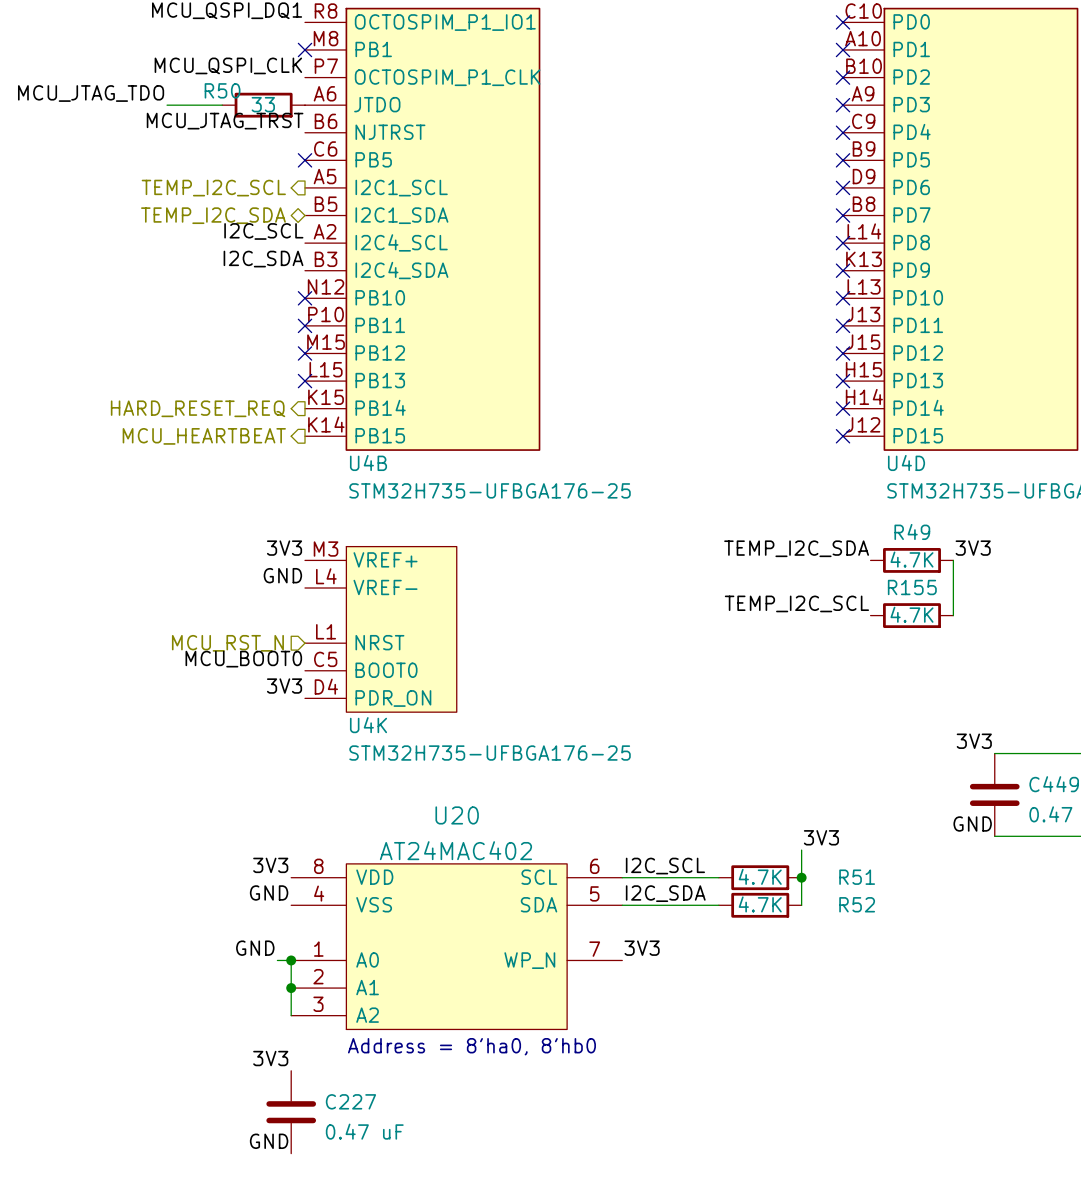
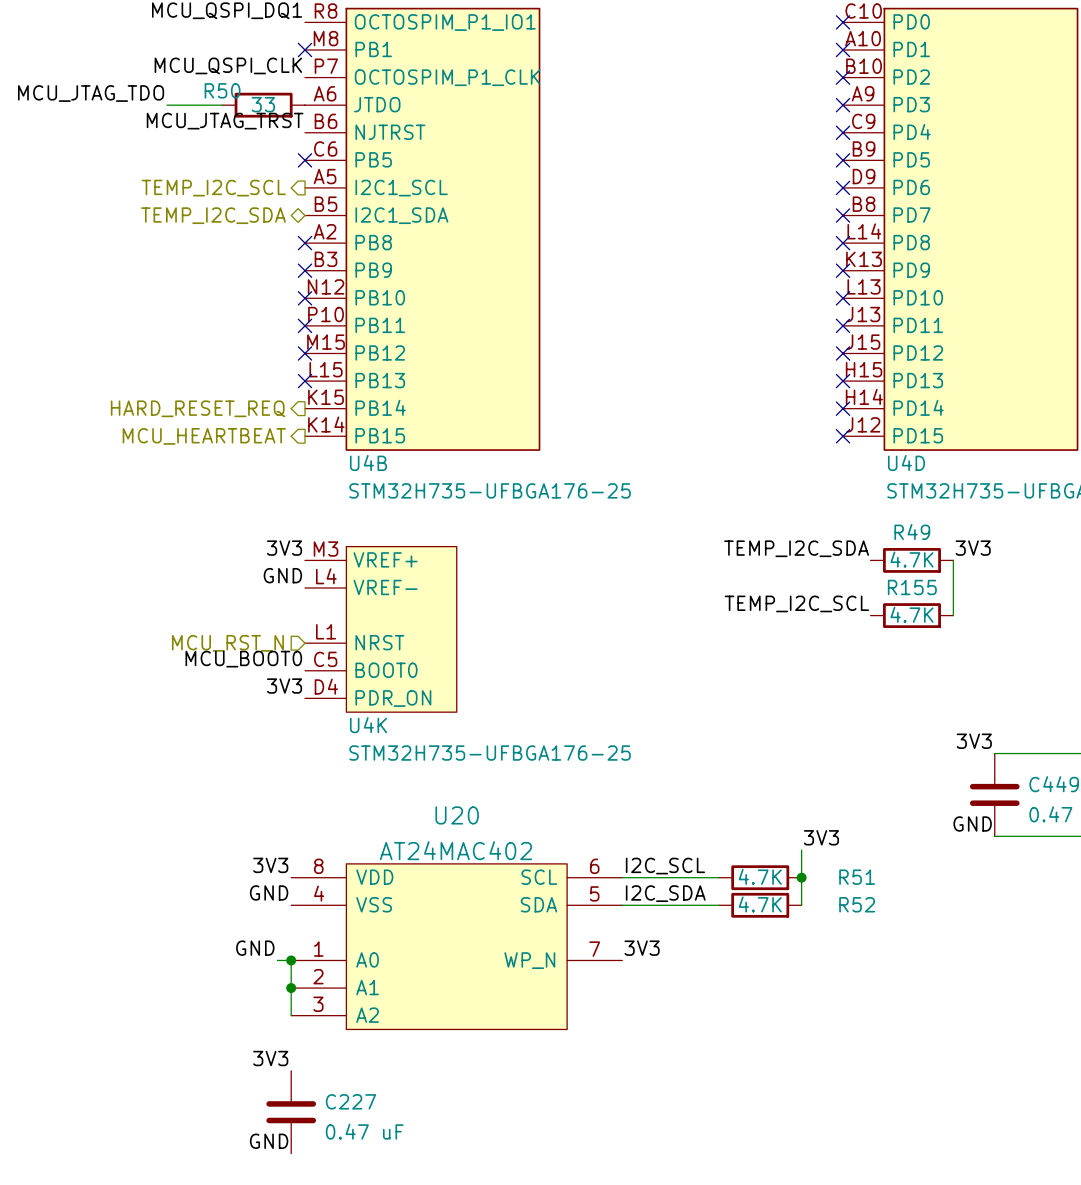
label: I2C_SCL (263, 231) -> none
U4B pin name: I2C4_SCL (401, 242) -> PB8 (373, 242)
no-connect mark: none -> (305, 243)
label: I2C_SDA (263, 259) -> none
no-connect mark: none -> (305, 270)
U4B pin name: I2C4_SDA (401, 270) -> PB9 (373, 270)
text: Address = 8'ha0, 8'hb0 (471, 1046) -> none

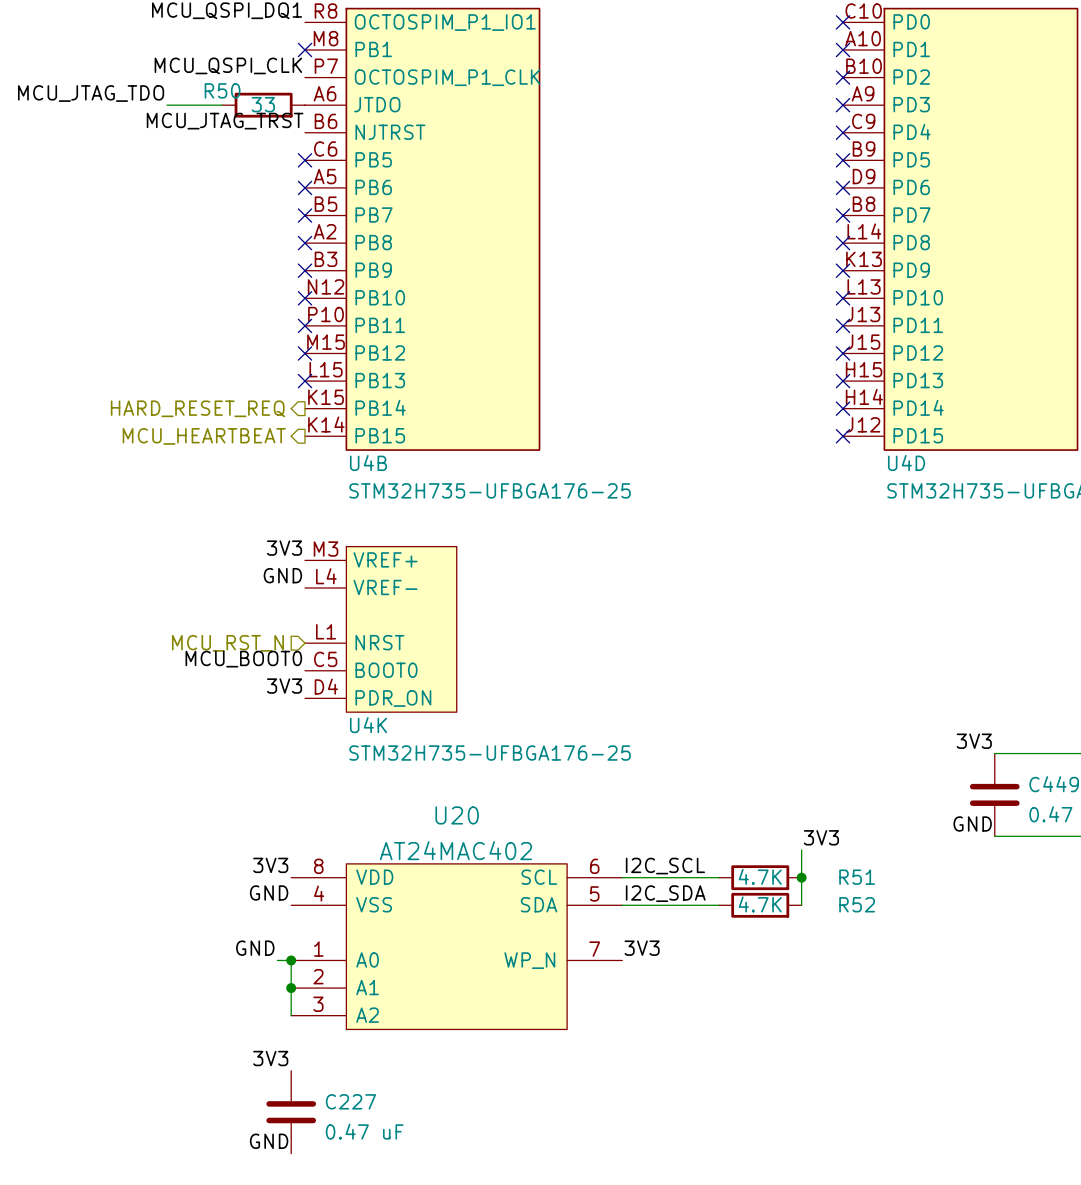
no-connect mark: none -> (305, 187)
hierarchical label: TEMP_I2C_SCL (213, 188) -> none
U4B pin name: I2C1_SCL (401, 188) -> PB6 (373, 187)
hierarchical label: TEMP_I2C_SDA (213, 215) -> none
no-connect mark: none -> (305, 215)
U4B pin name: I2C1_SDA (401, 215) -> PB7 (374, 215)
label: TEMP_I2C_SDA (796, 548) -> none
label: 3V3 (973, 548) -> none
R49: 4.7K (911, 560) -> none
wire: (953, 560) (953, 615) -> none
label: TEMP_I2C_SCL (796, 603) -> none
R155: 4.7K (911, 615) -> none

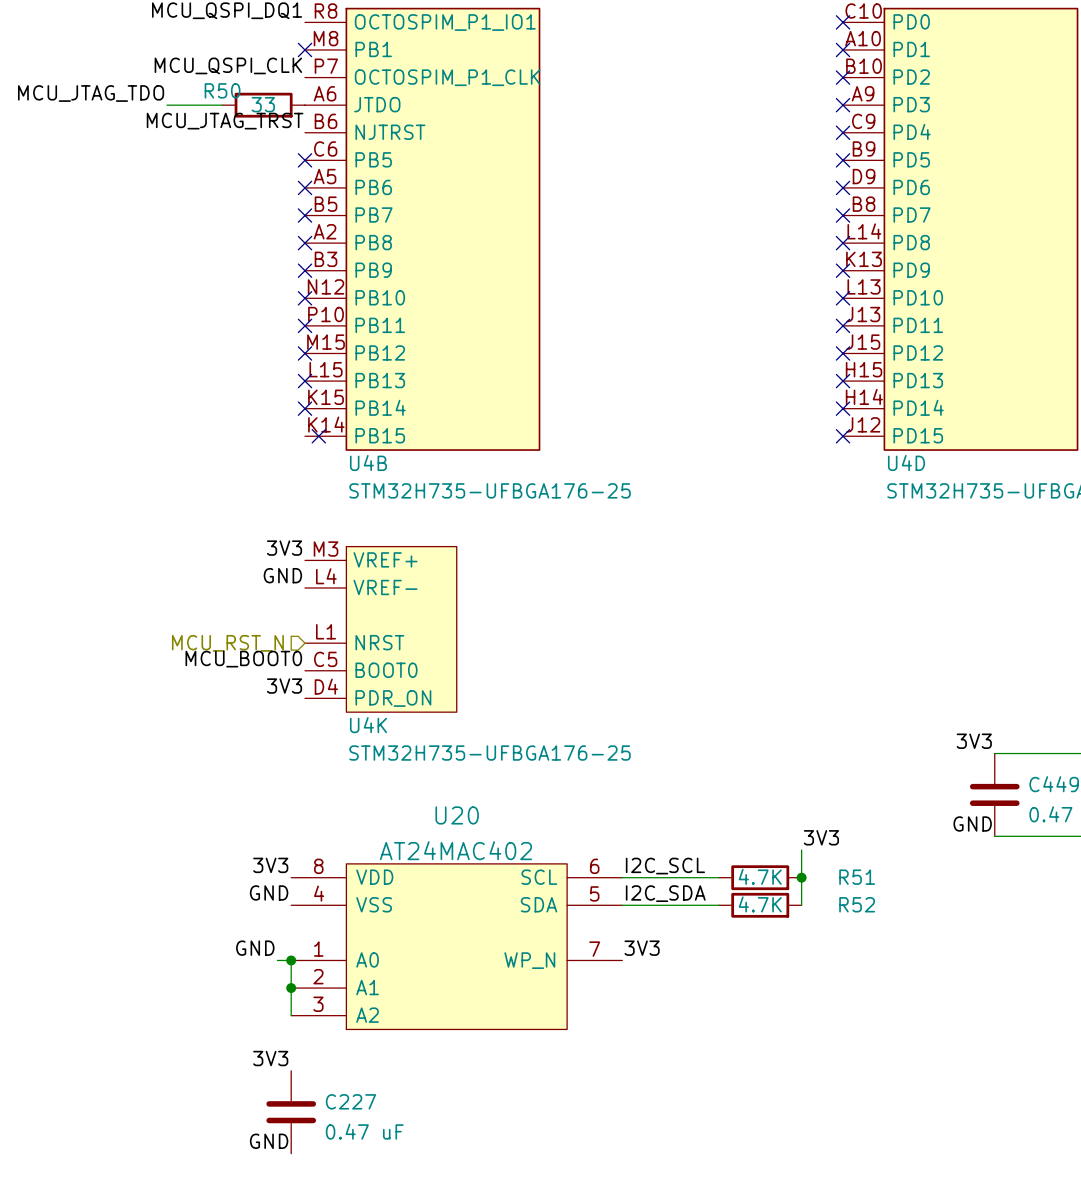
hierarchical label: HARD_RESET_REQ (198, 408) -> none
no-connect mark: none -> (305, 408)
hierarchical label: MCU_HEARTBEAT (204, 436) -> none
no-connect mark: none -> (318, 436)

